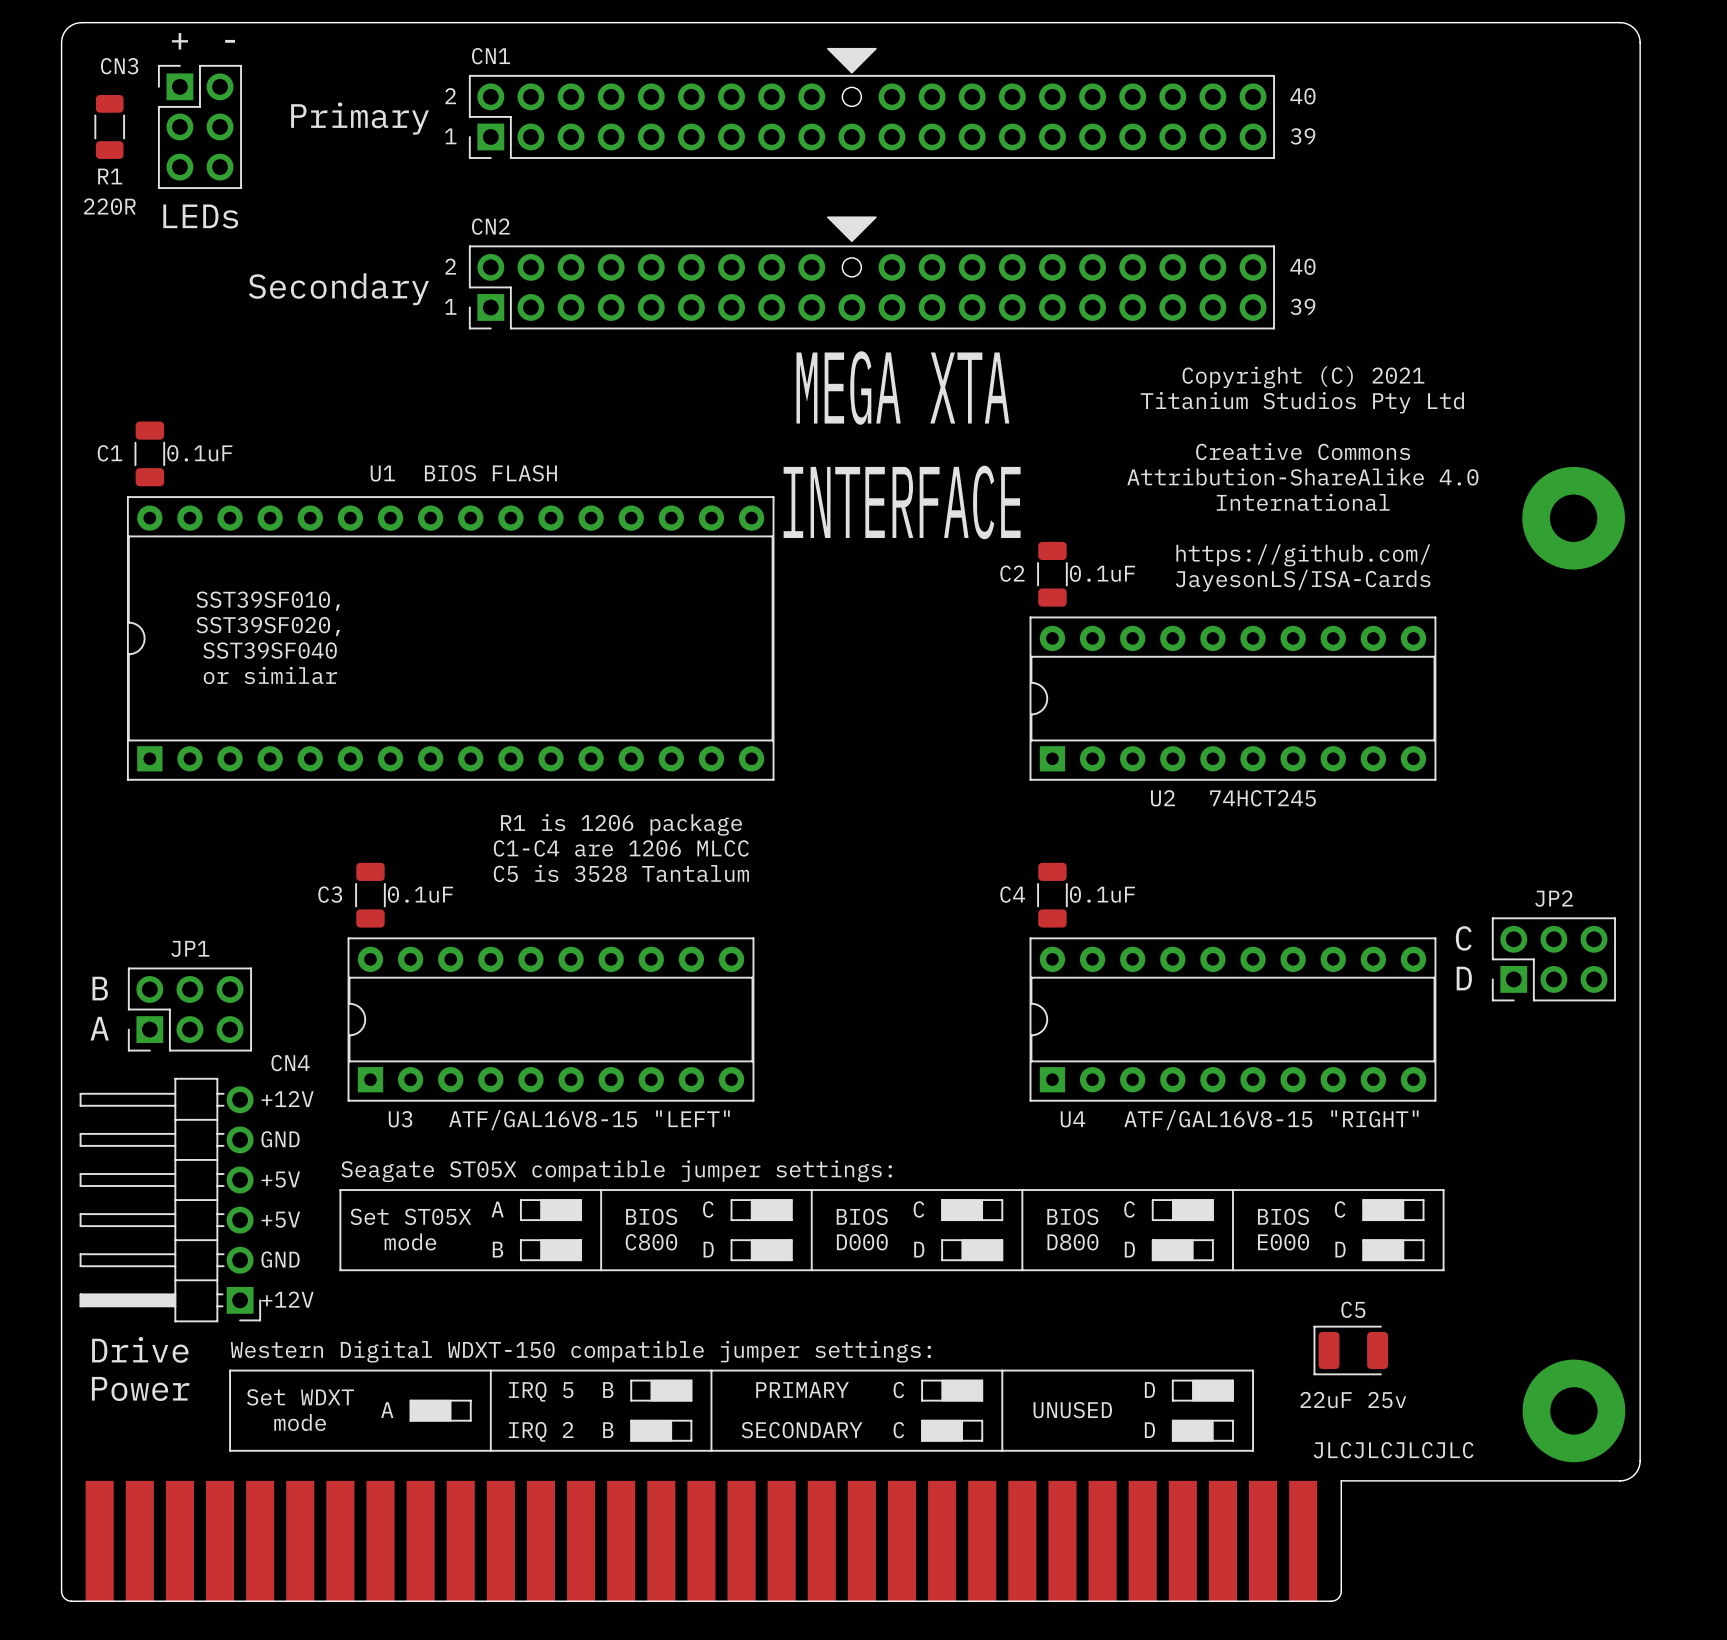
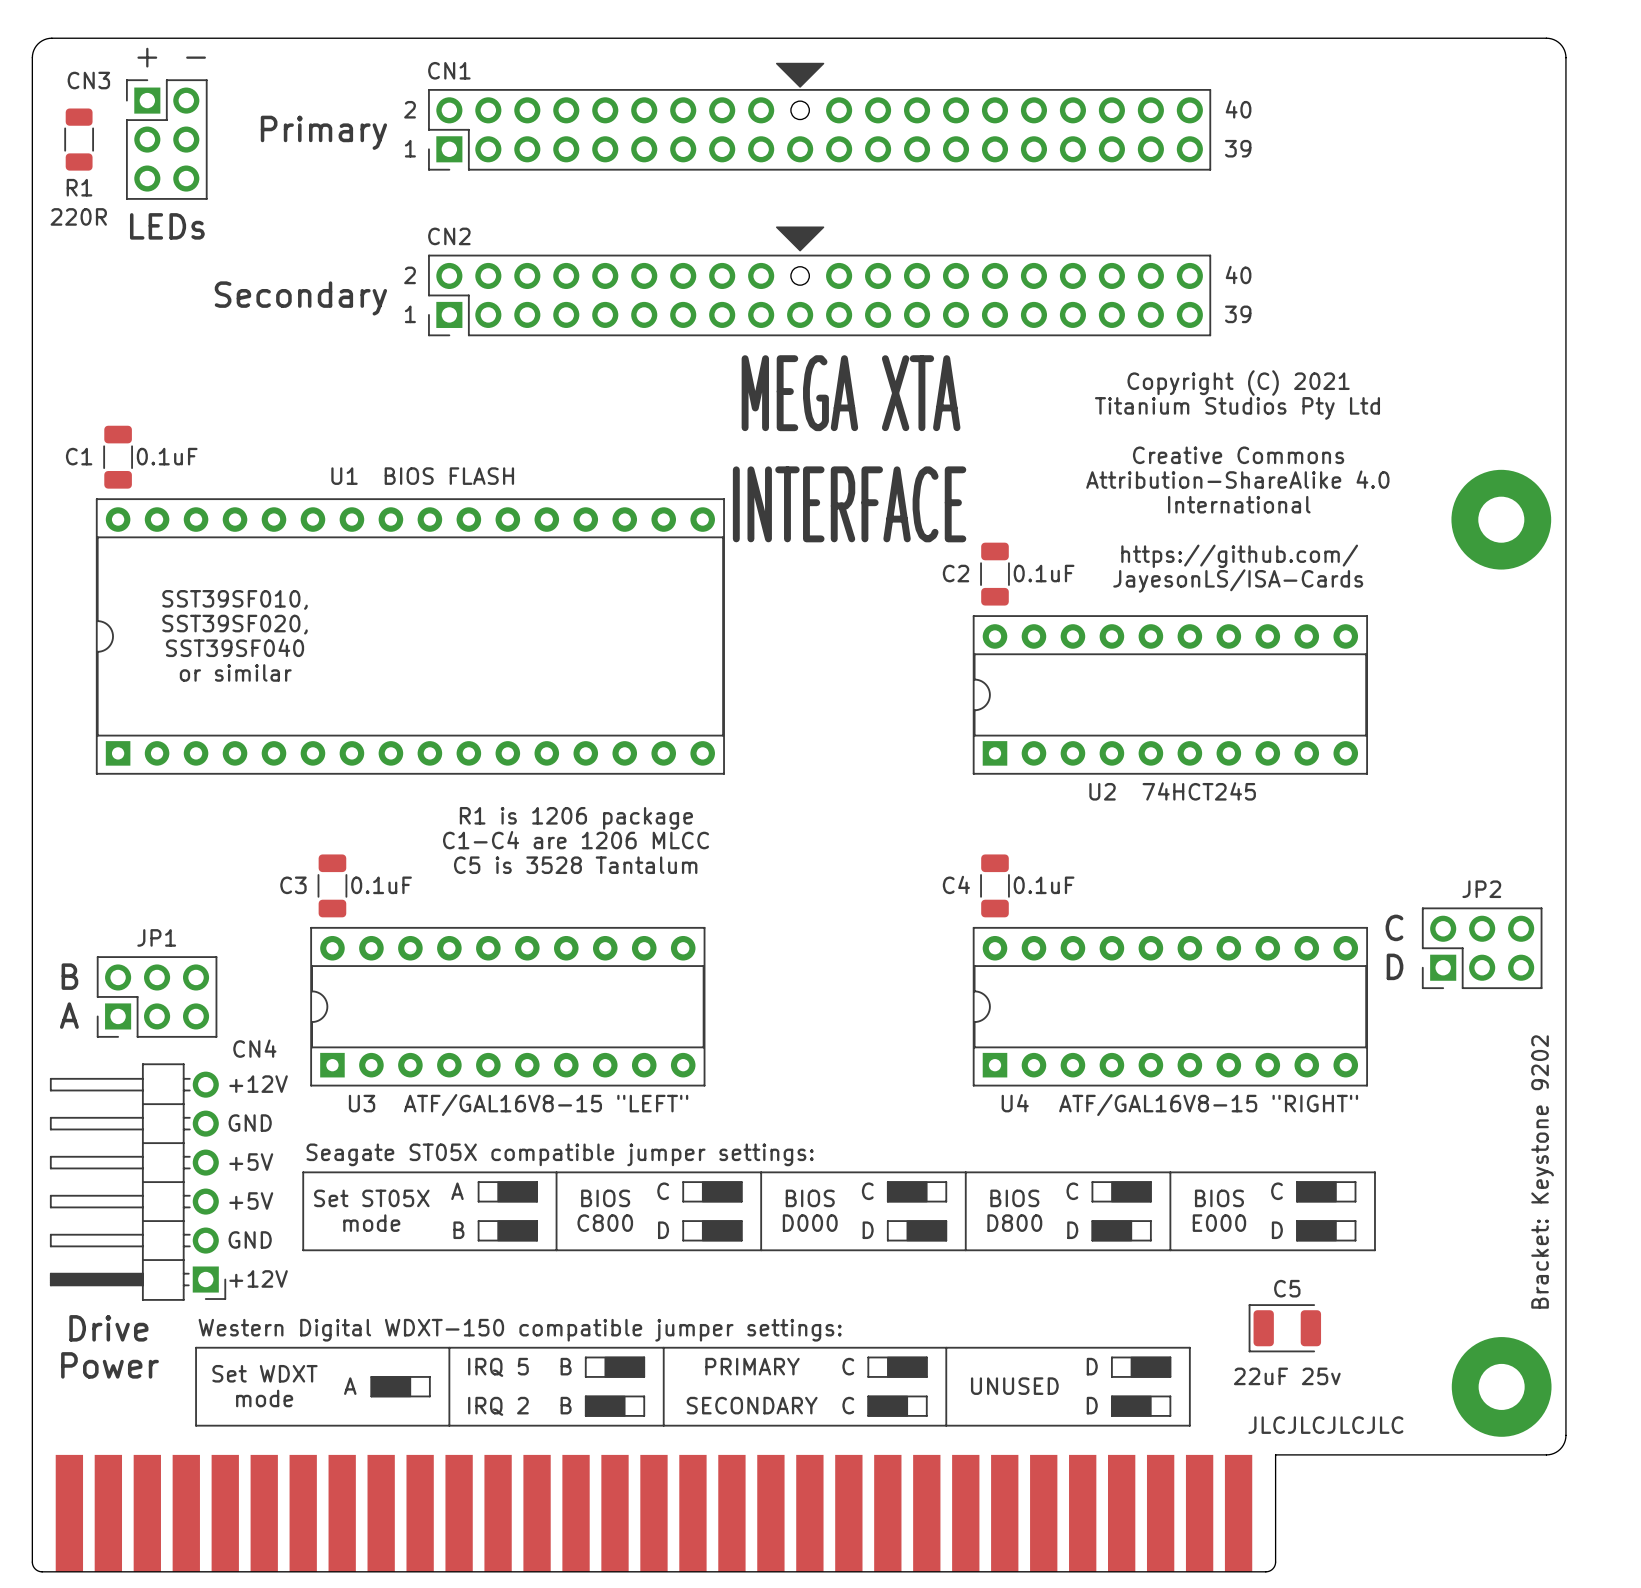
text: none -> Bracket: Keystone 9202 (1542, 1171)

